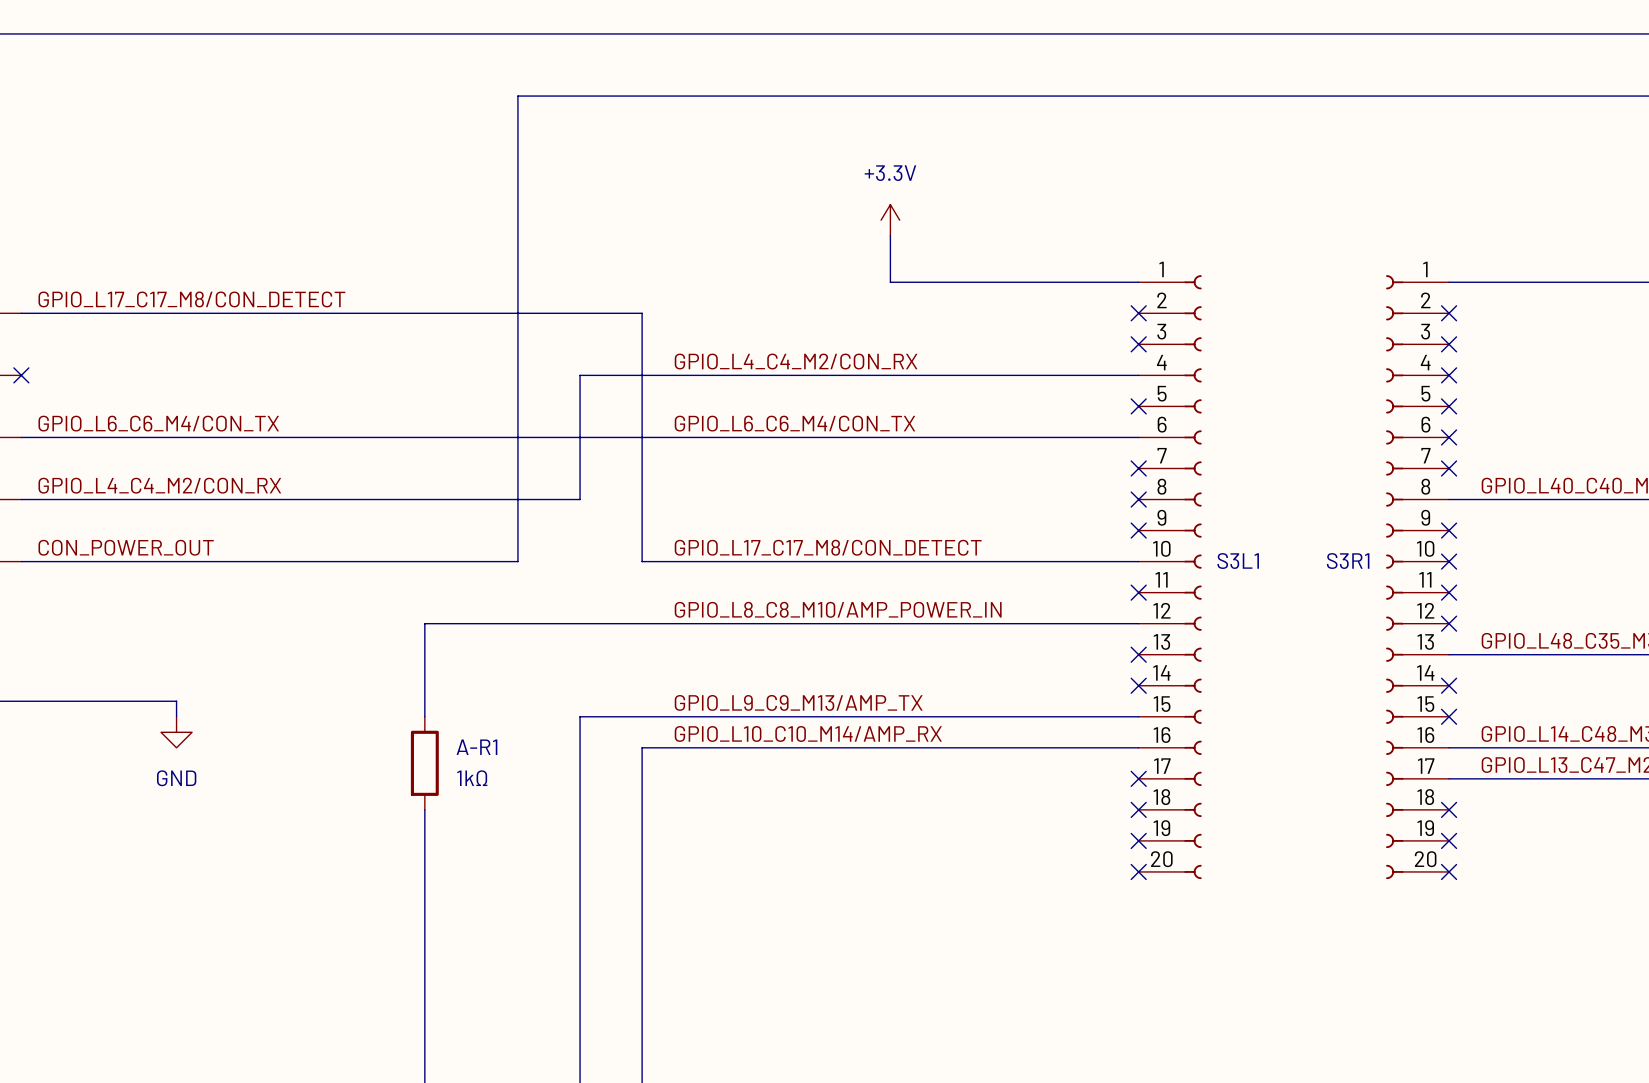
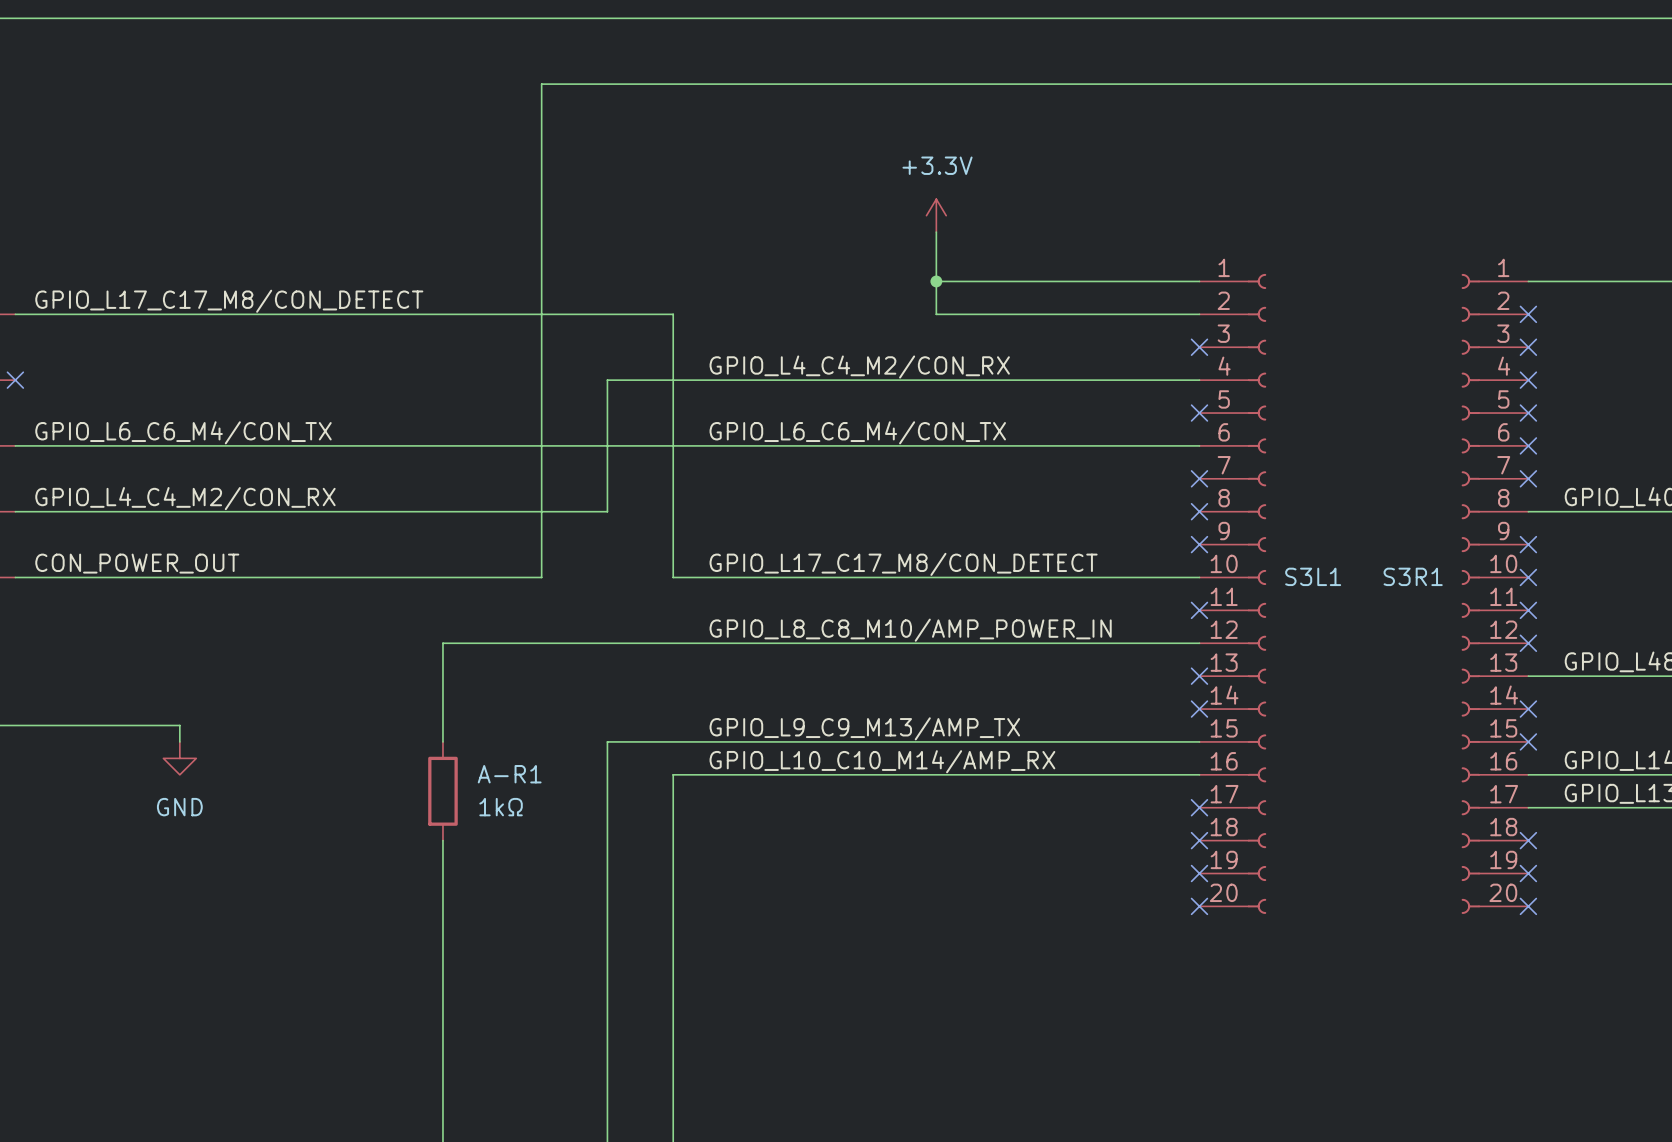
wire: none -> (936, 281) (936, 314) (1199, 314)
junction: none -> (936, 281)
no-connect mark: (1138, 313) -> none

